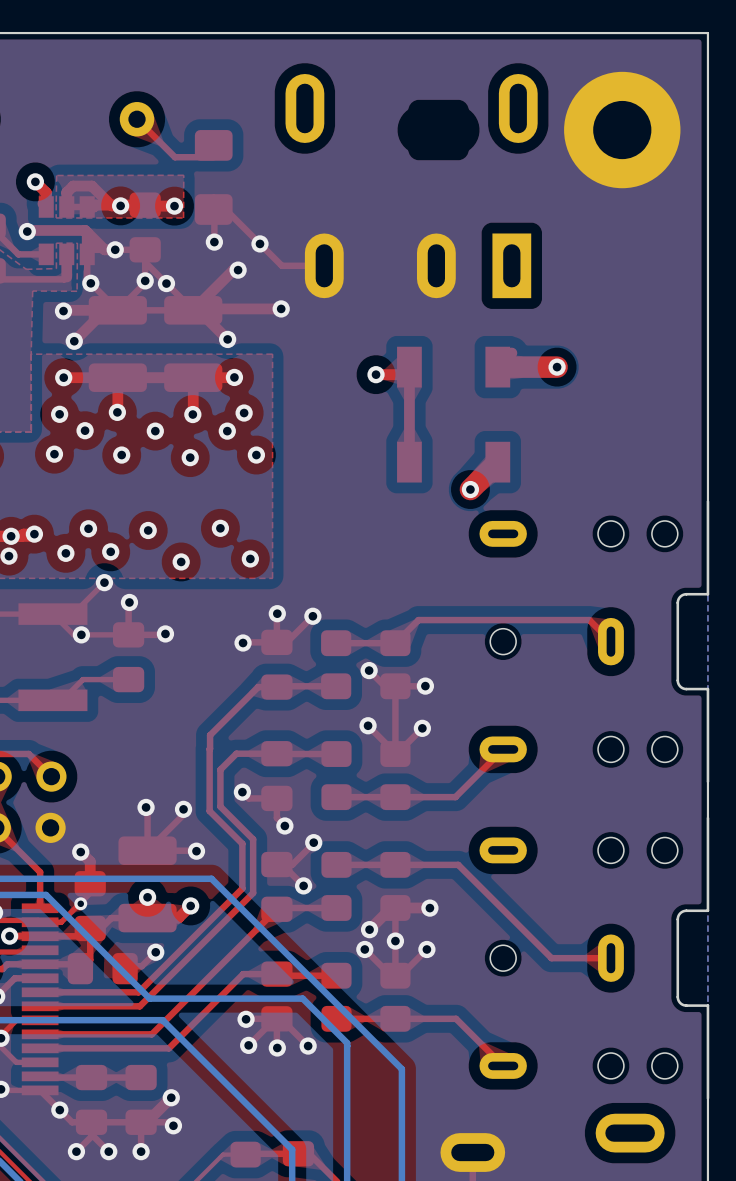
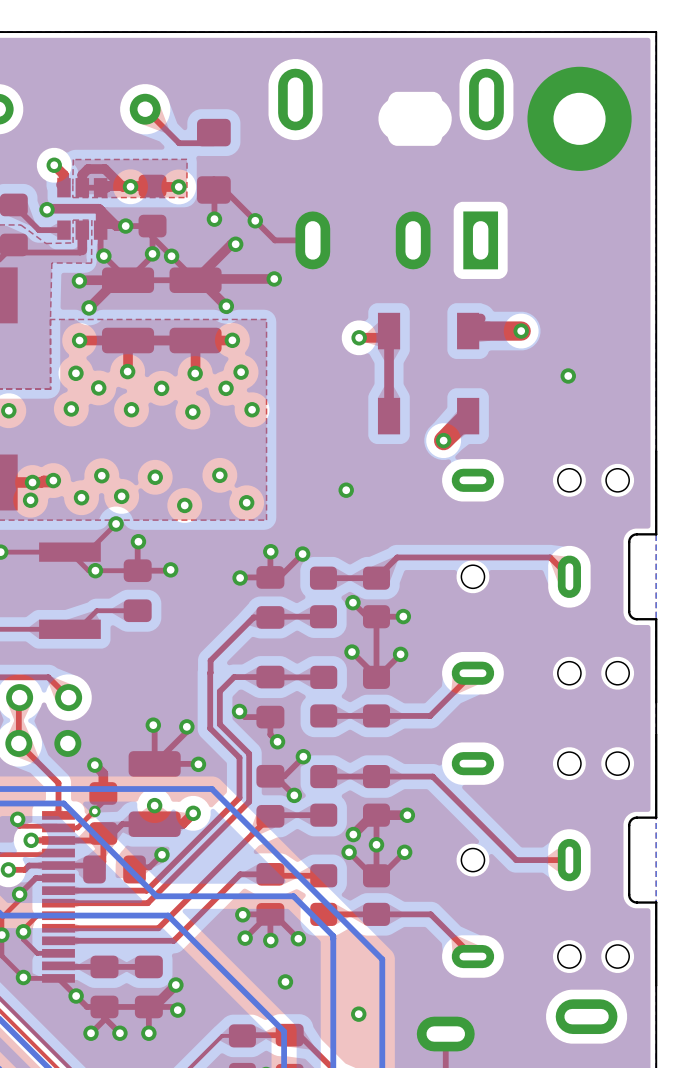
via: none -> (568, 376)
via: none -> (346, 490)
via: none -> (285, 981)
via: none -> (358, 1014)

